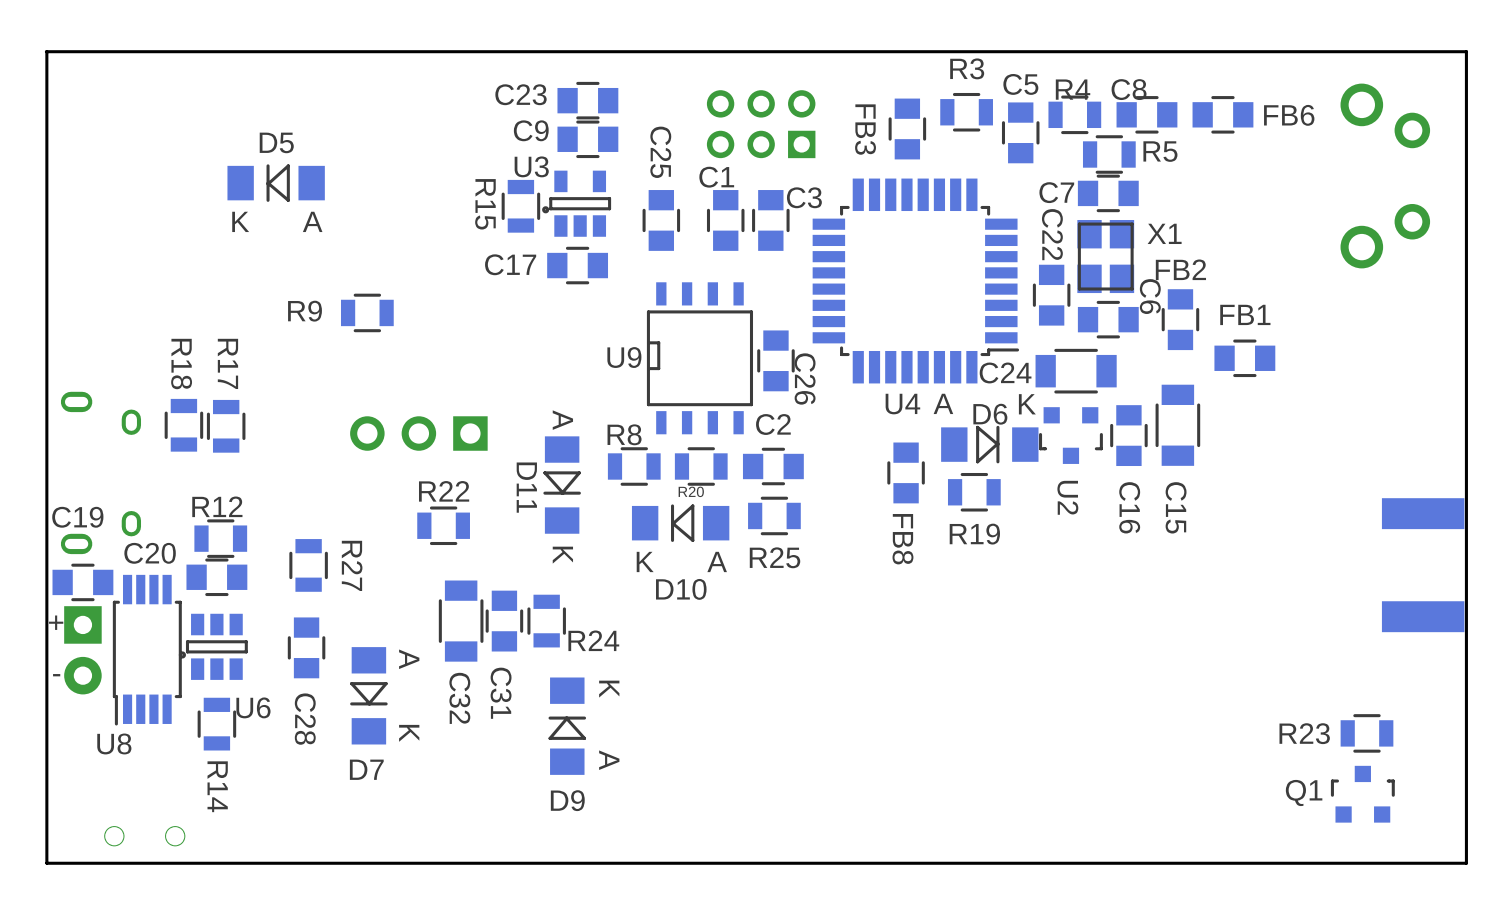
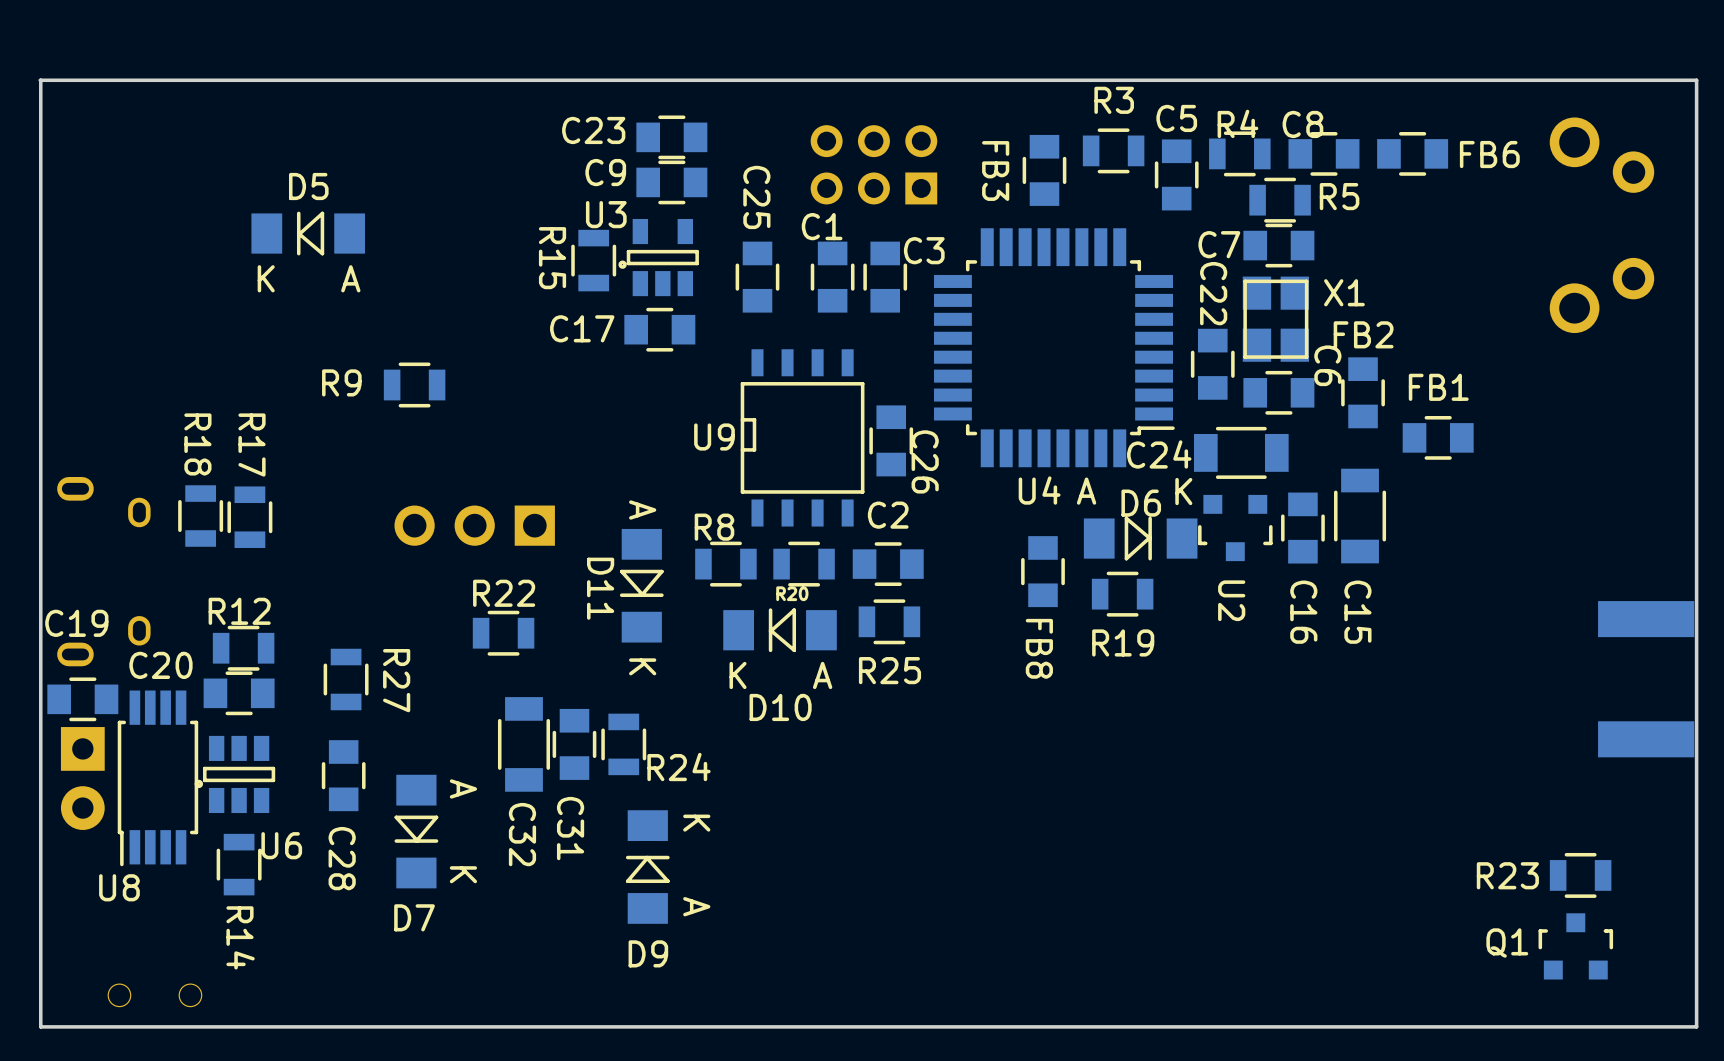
text: + (56, 622) -> none
text: - (56, 675) -> none

